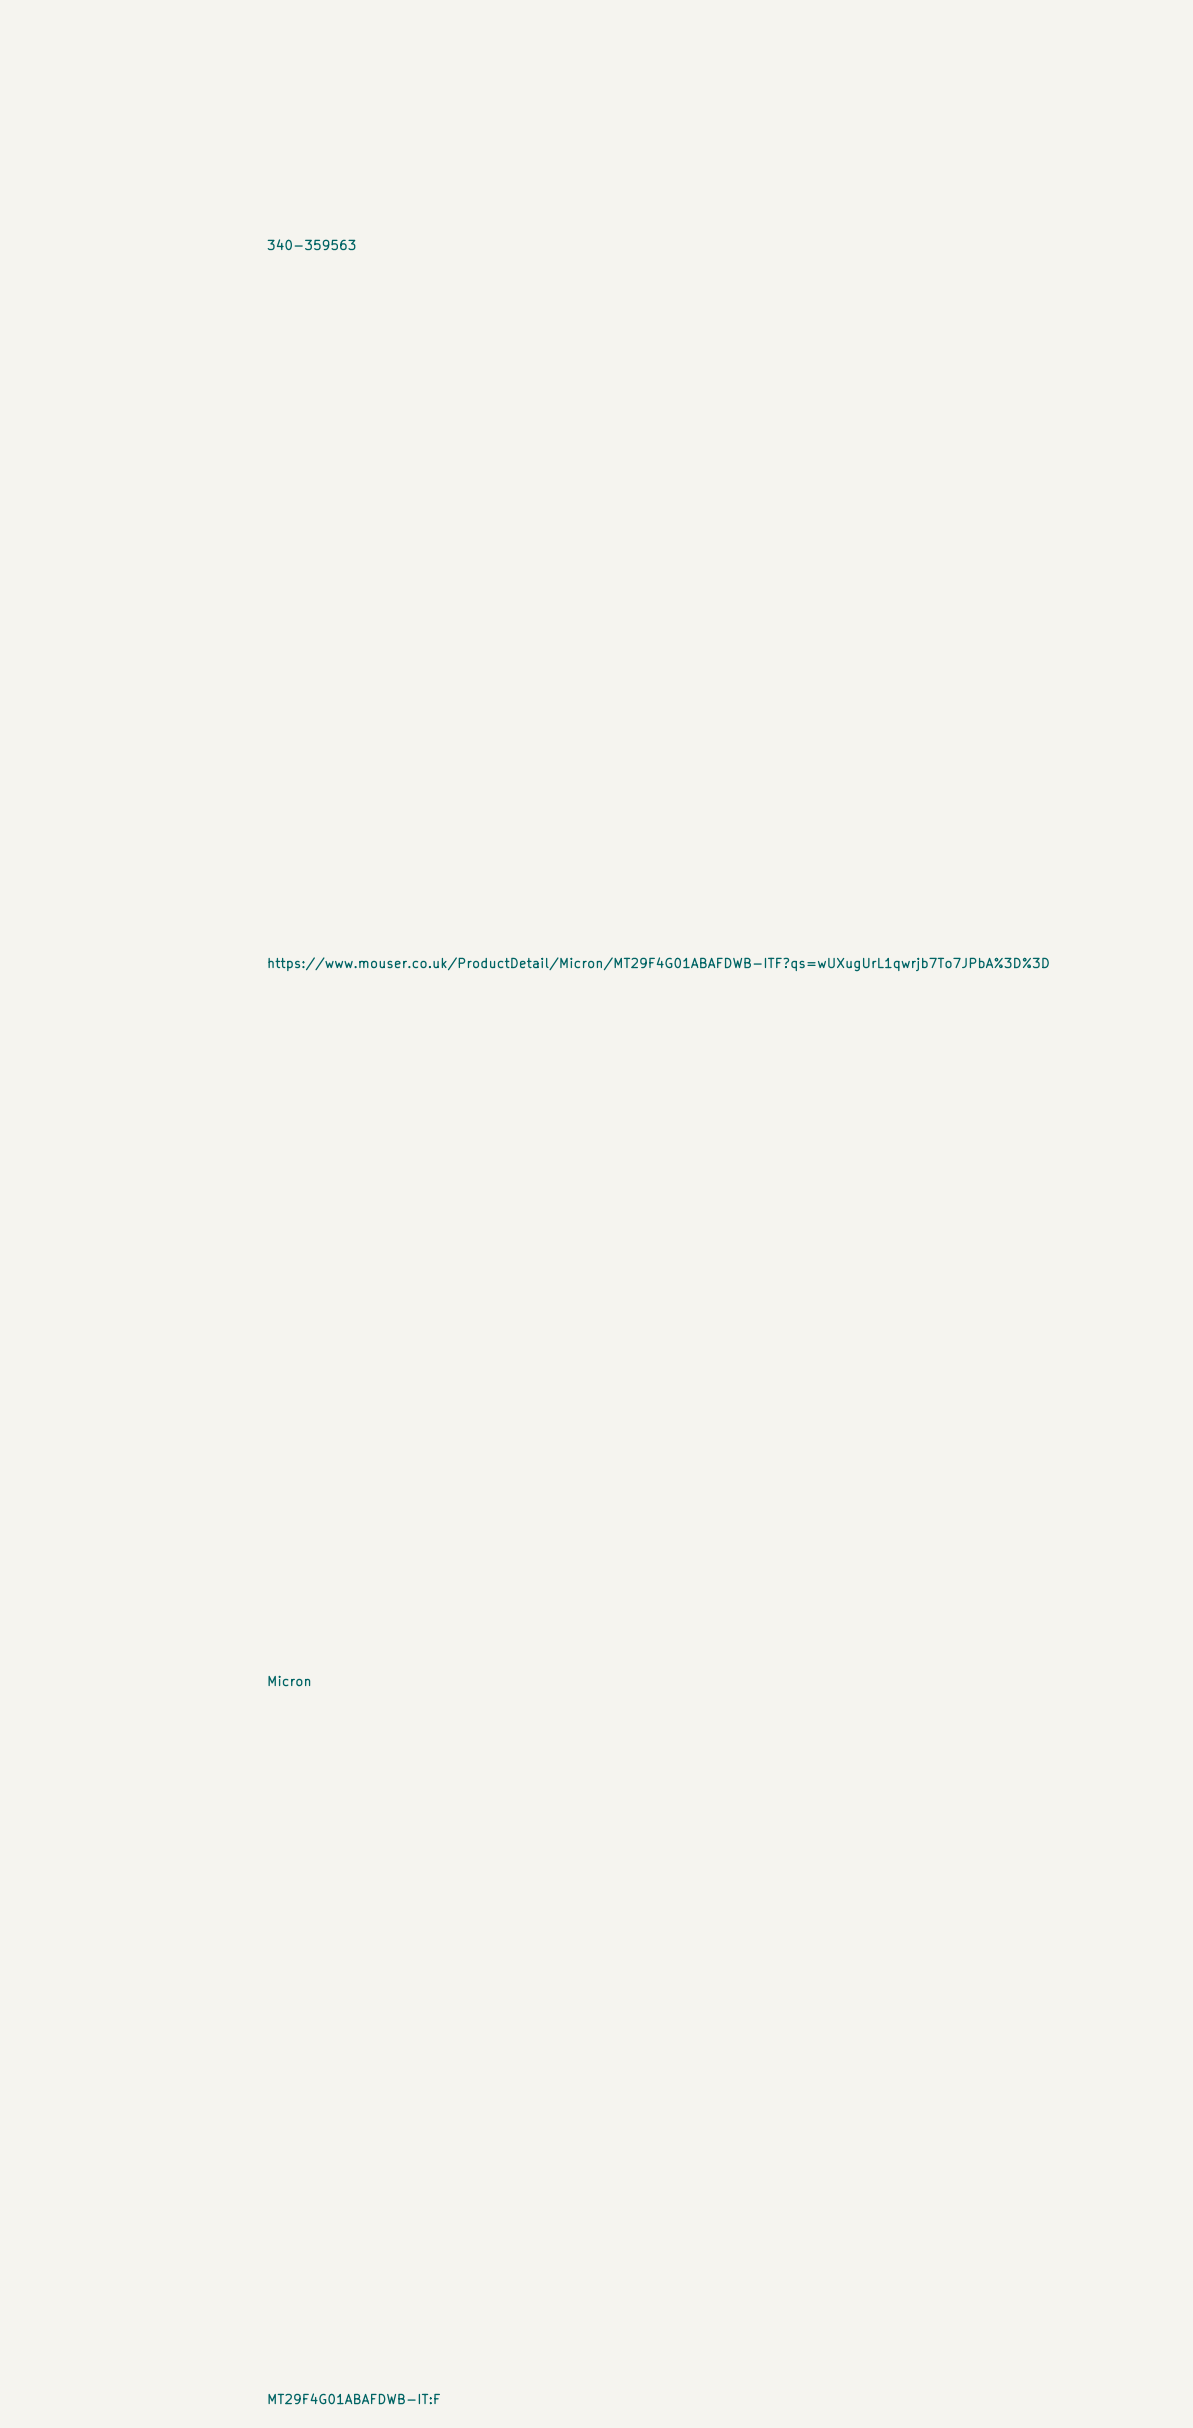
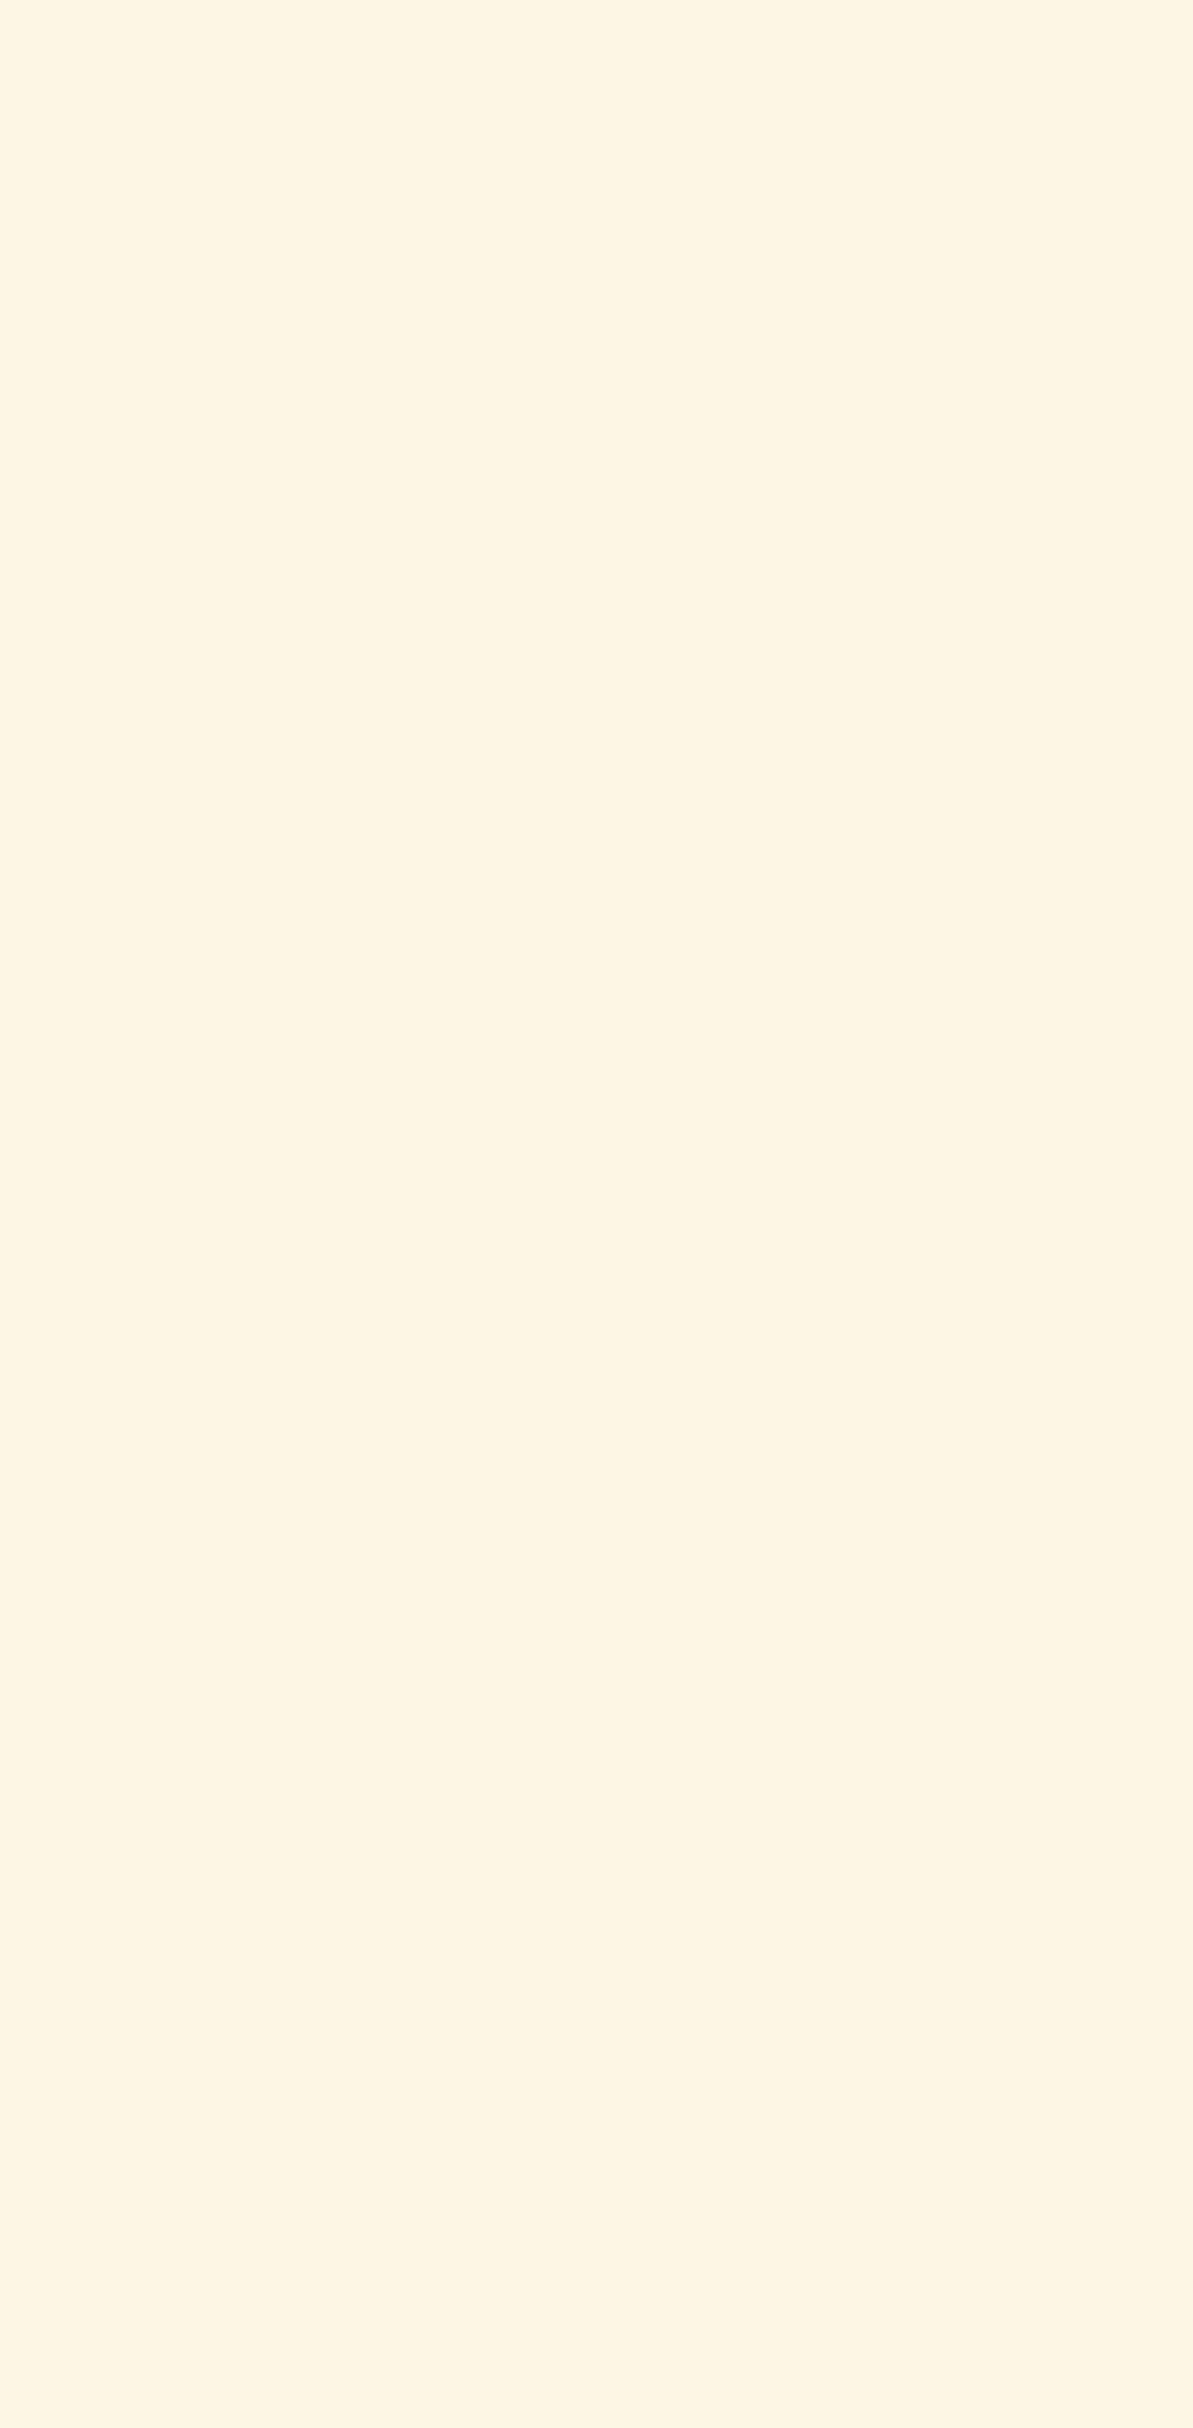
part text: 340-359563 (311, 244) -> none
part text: https://www.mouser.co.uk/ProductDetail/Micron/MT29F4G01ABAFDWB-ITF?qs=wUXugUrL1qwrjb7To7JPbA%3D%3D (658, 964) -> none
part text: Micron (289, 1680) -> none
part text: MT29F4G01ABAFDWB-IT:F (354, 2398) -> none

